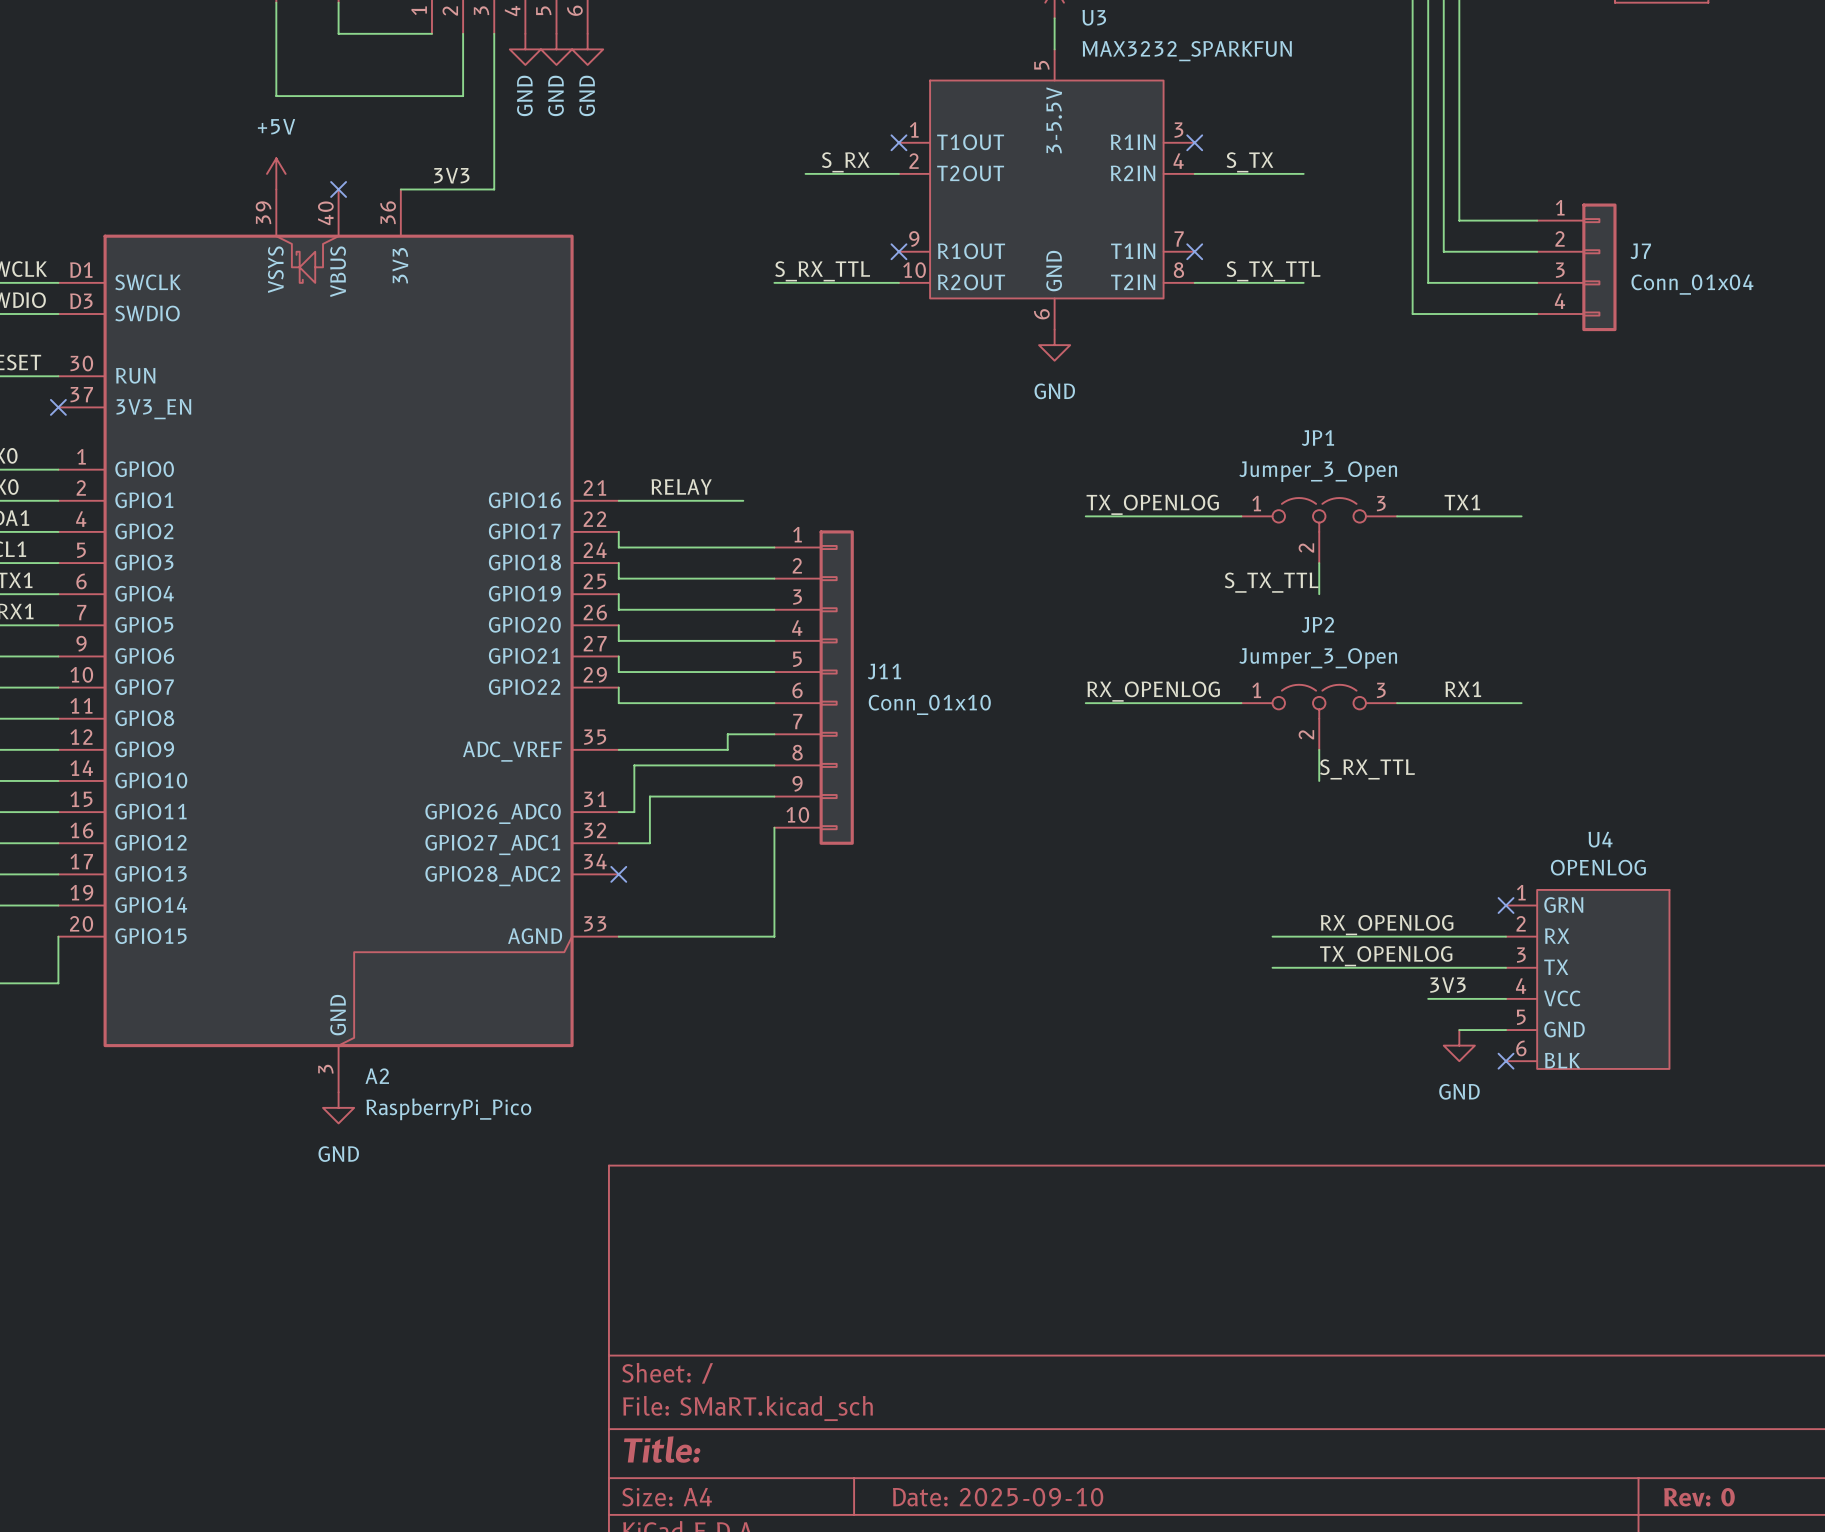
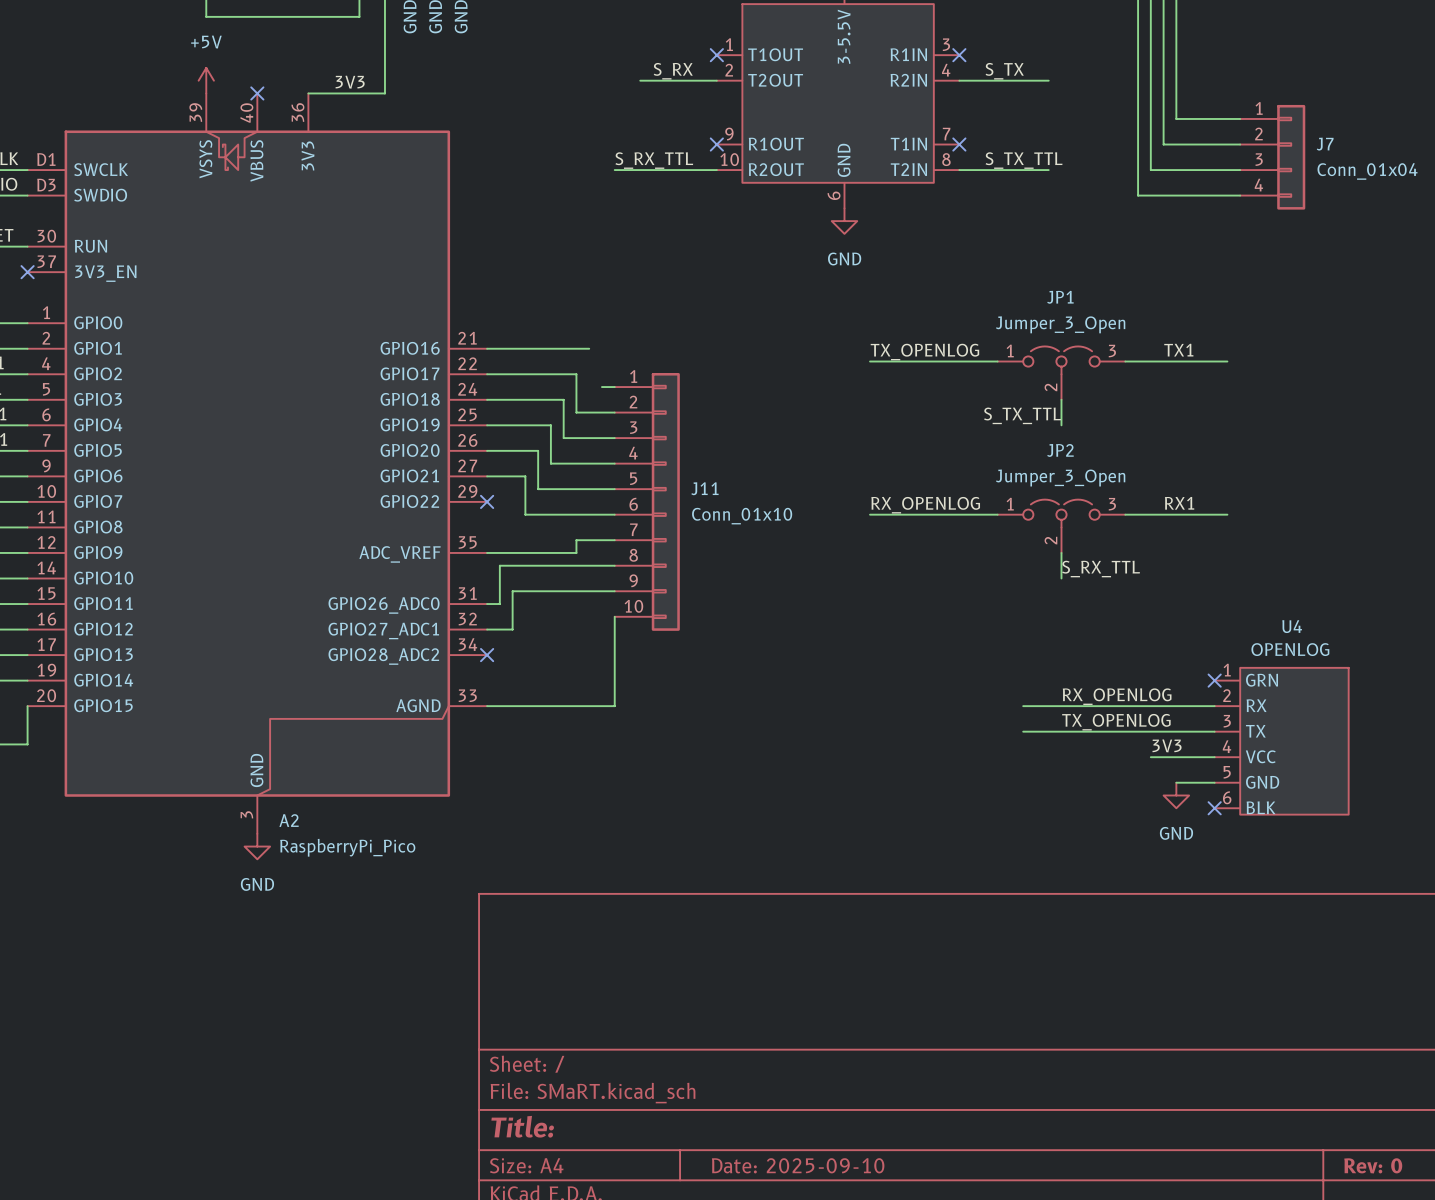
label: RELAY (681, 486) -> none
wire: (618, 531) (618, 547) (758, 547) -> none
wire: (618, 563) (618, 578) (727, 578) -> (487, 374) (576, 374) (576, 412)
wire: (618, 594) (618, 609) (712, 609) -> (487, 399) (563, 399) (563, 438)
wire: (618, 625) (618, 640) (696, 640) -> (487, 425) (550, 425) (550, 463)
wire: (618, 656) (618, 672) (681, 672) -> (487, 450) (538, 450) (538, 489)
wire: (618, 687) (618, 703) (665, 703) -> (487, 476) (525, 476) (525, 514)
no-connect mark: none -> (487, 501)

